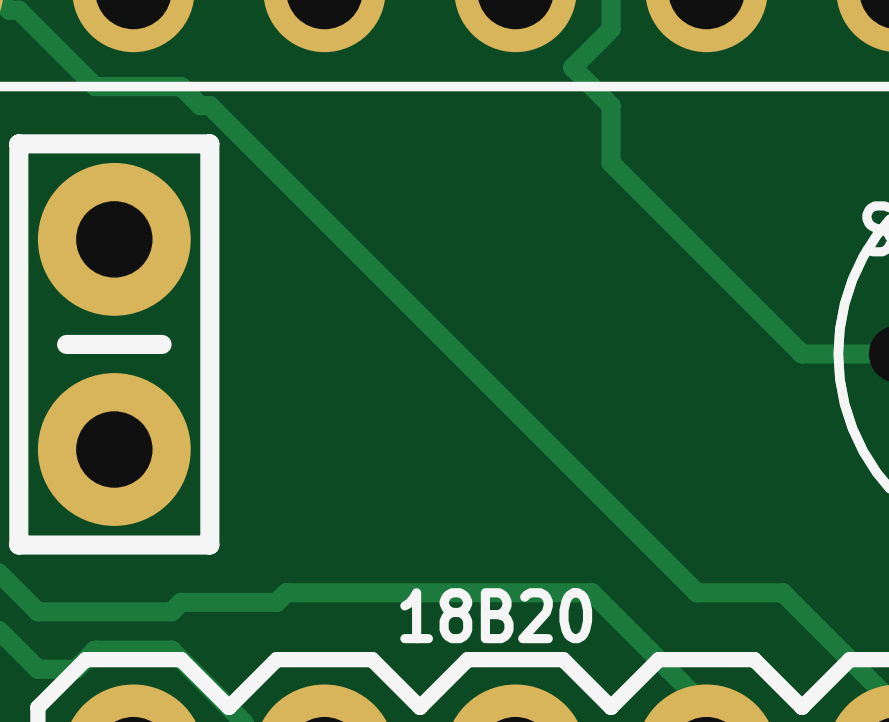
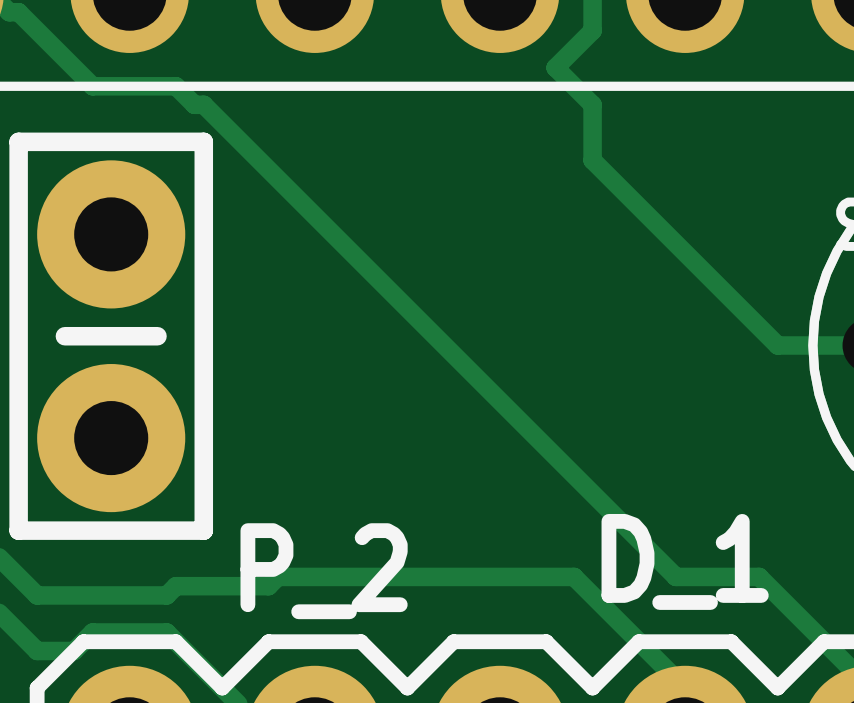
text: none -> D_1 (685, 561)
text: none -> P_2 (324, 571)
18B20 name: 18B20 (496, 615) -> none

